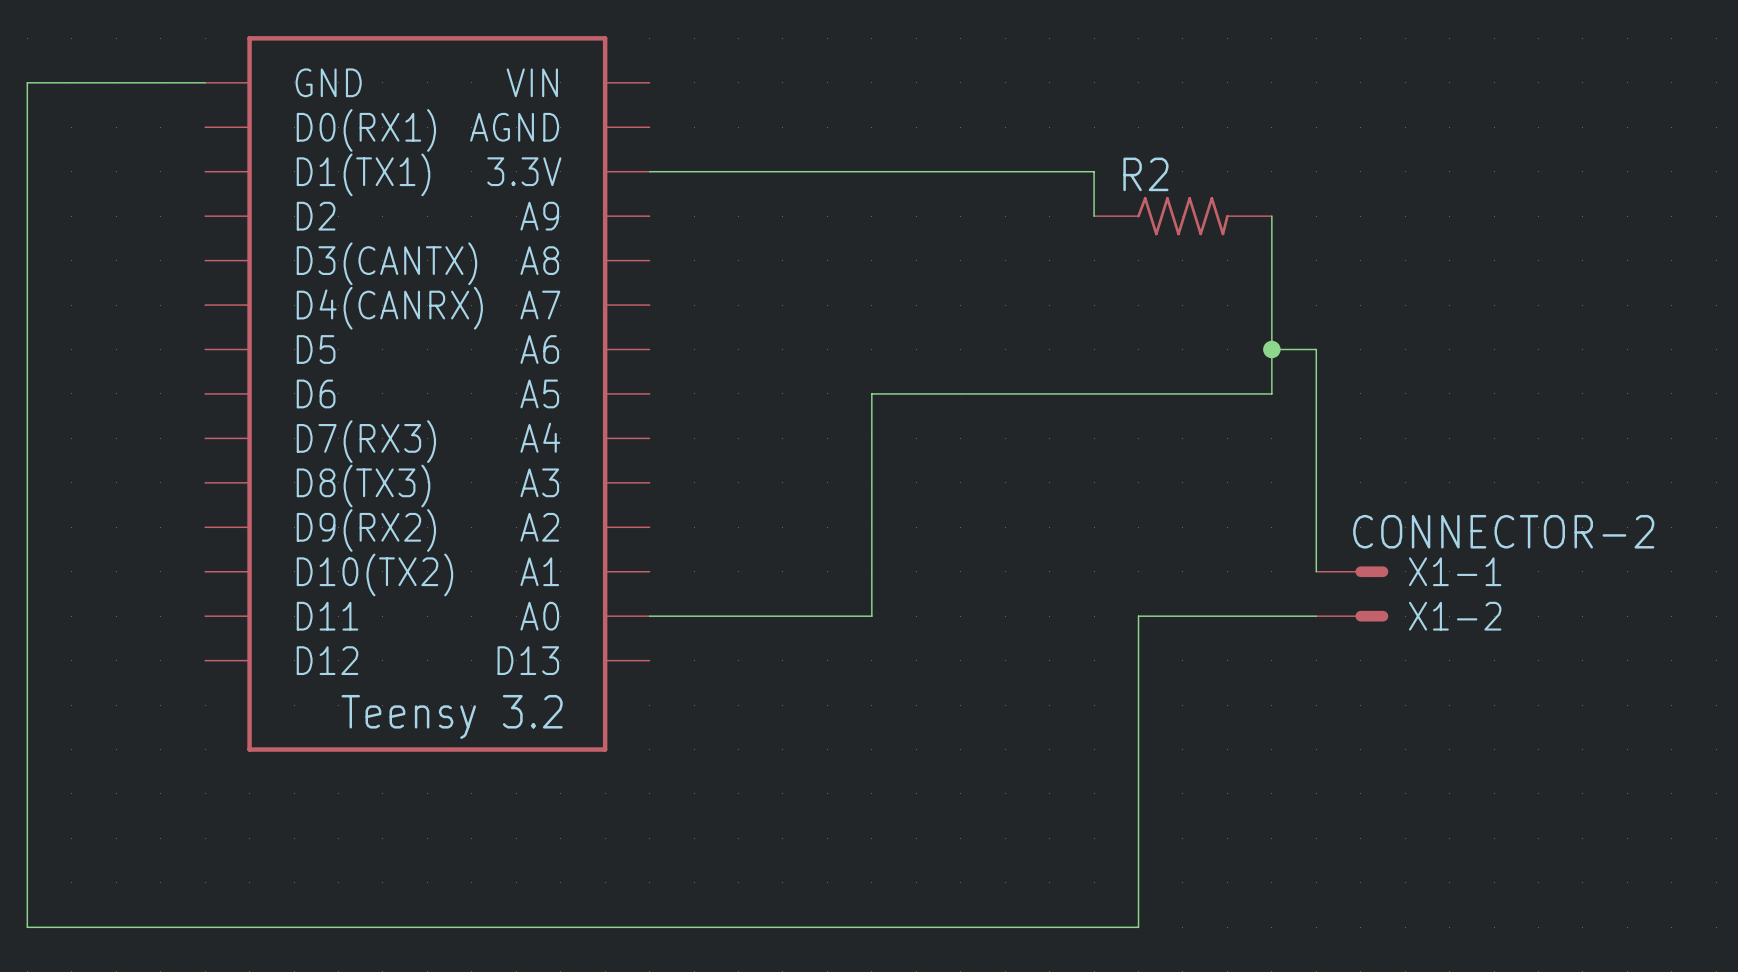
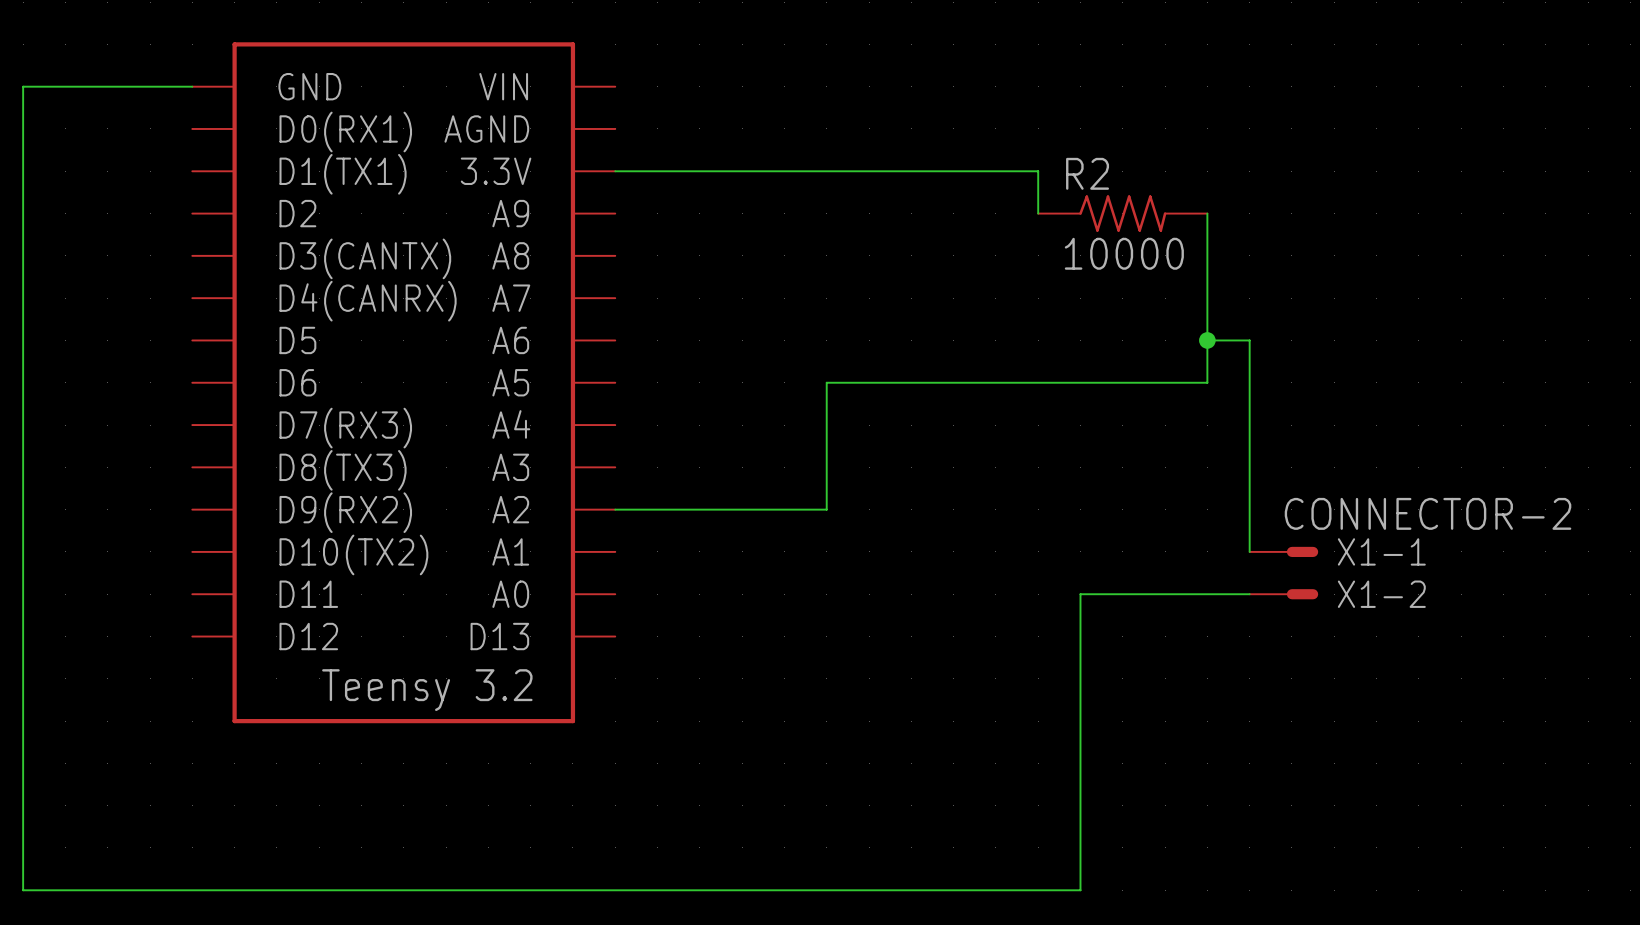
R2 value: none -> 10000 (1124, 253)
wire: (871, 527) (871, 616) (649, 616) -> (826, 509) (615, 509)

